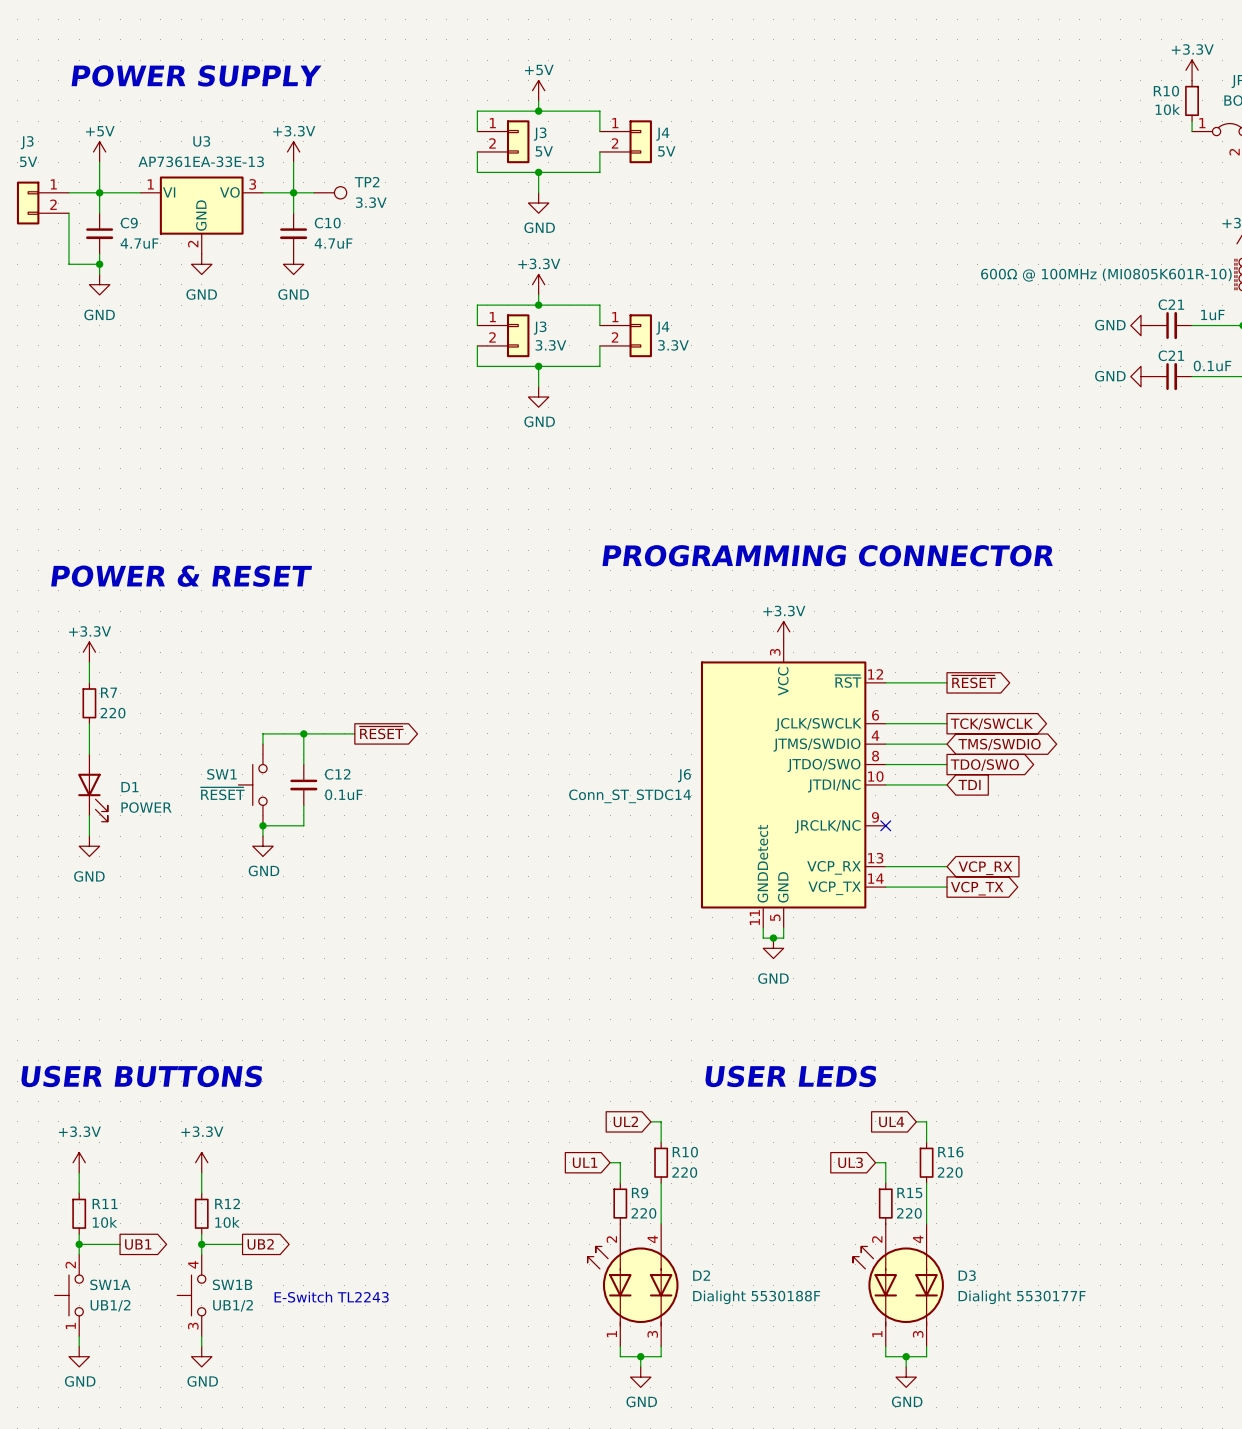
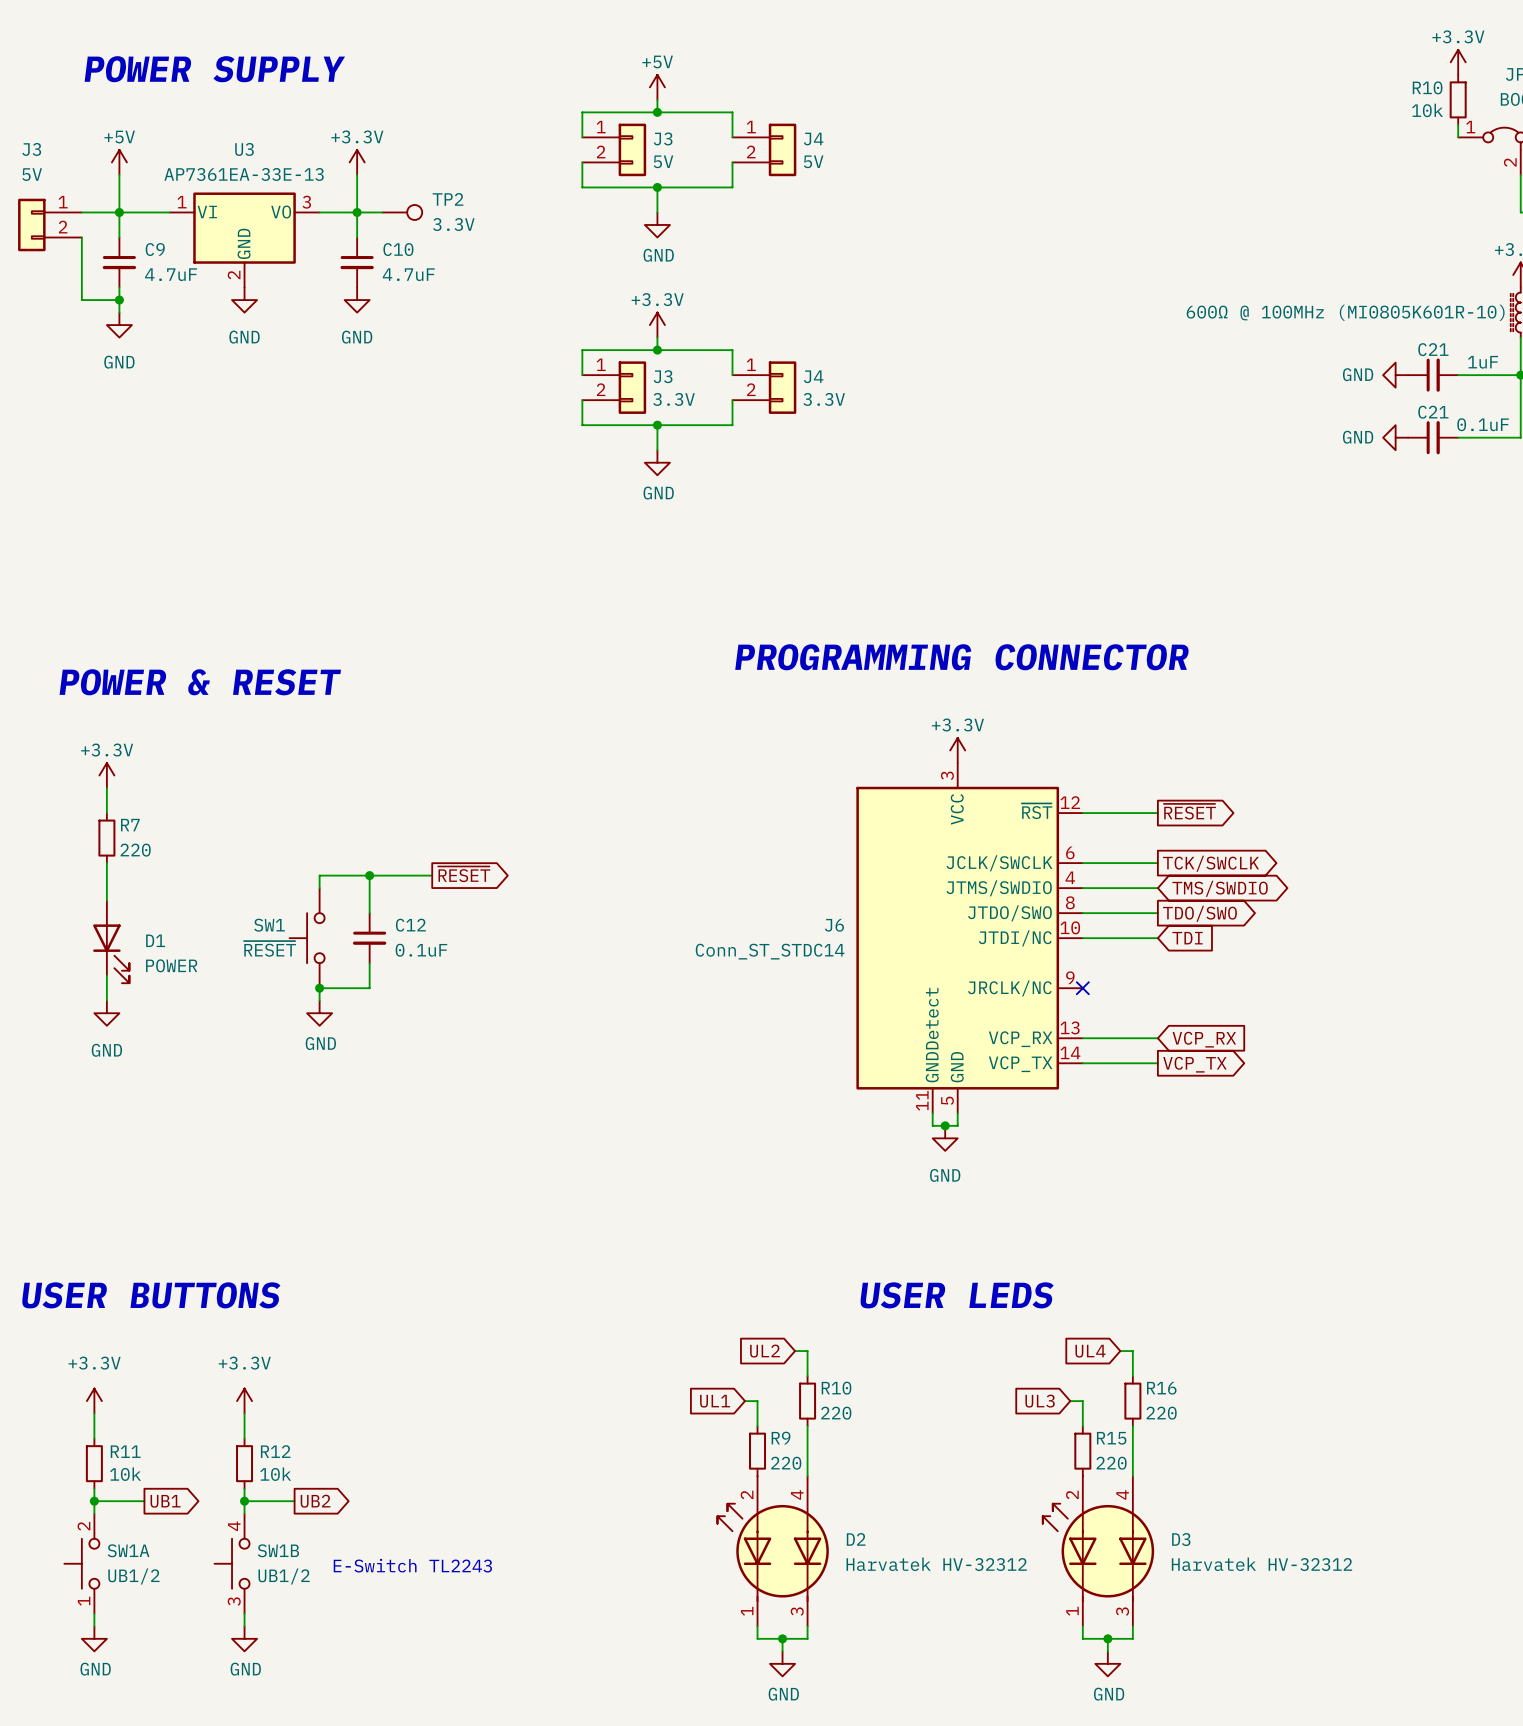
D2 value: Dialight 5530188F (756, 1297) -> Harvatek HV-32312 (936, 1564)
D3 value: Dialight 5530177F (1022, 1297) -> Harvatek HV-32312 (1261, 1564)

